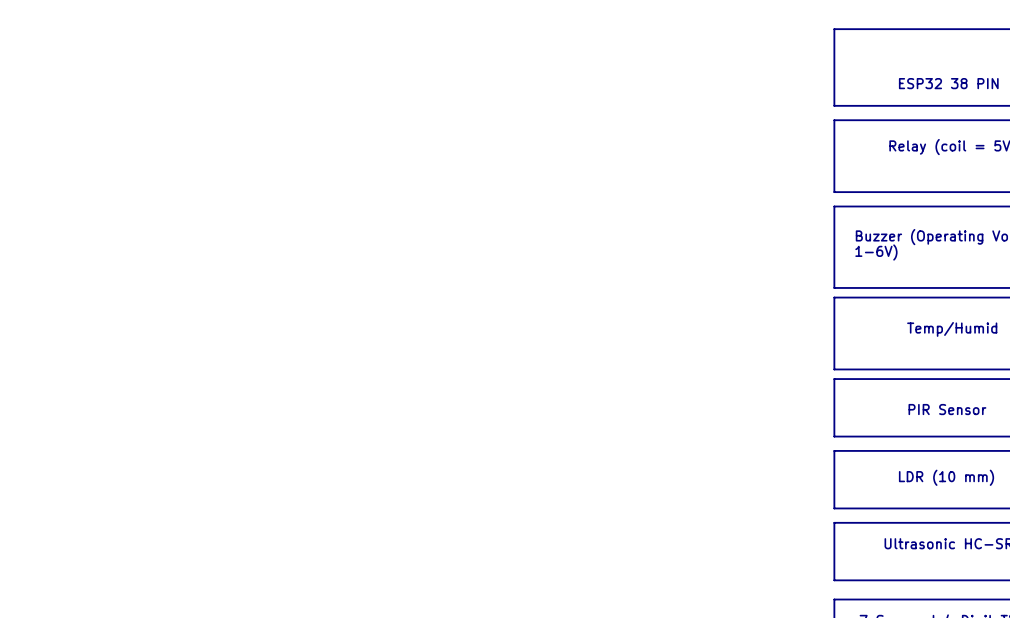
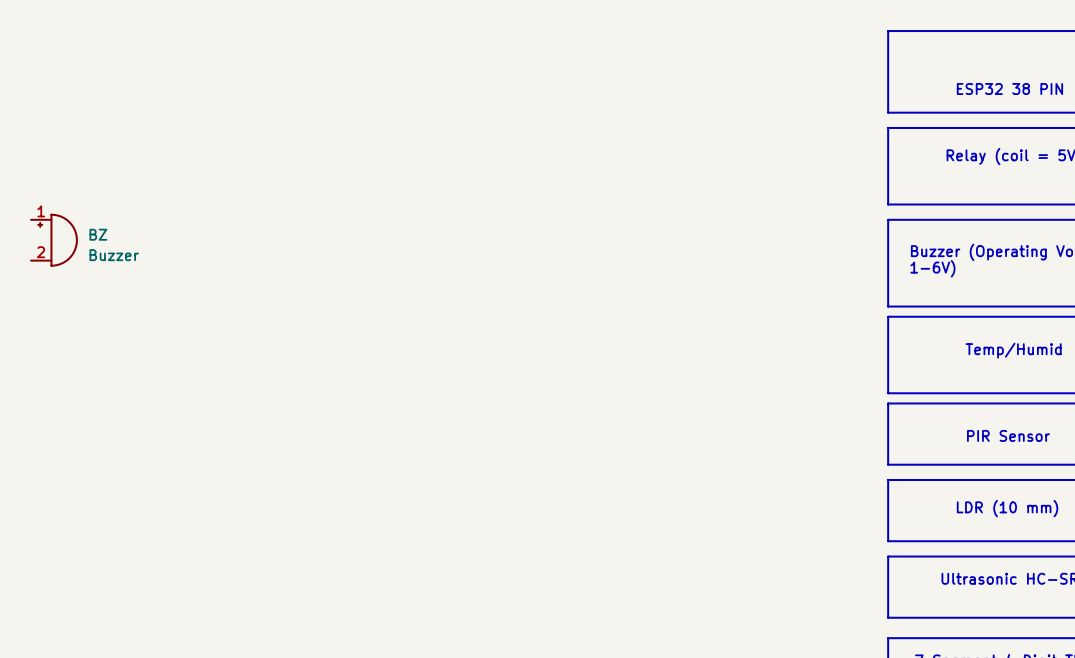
BZ: none -> Buzzer (53, 240)

